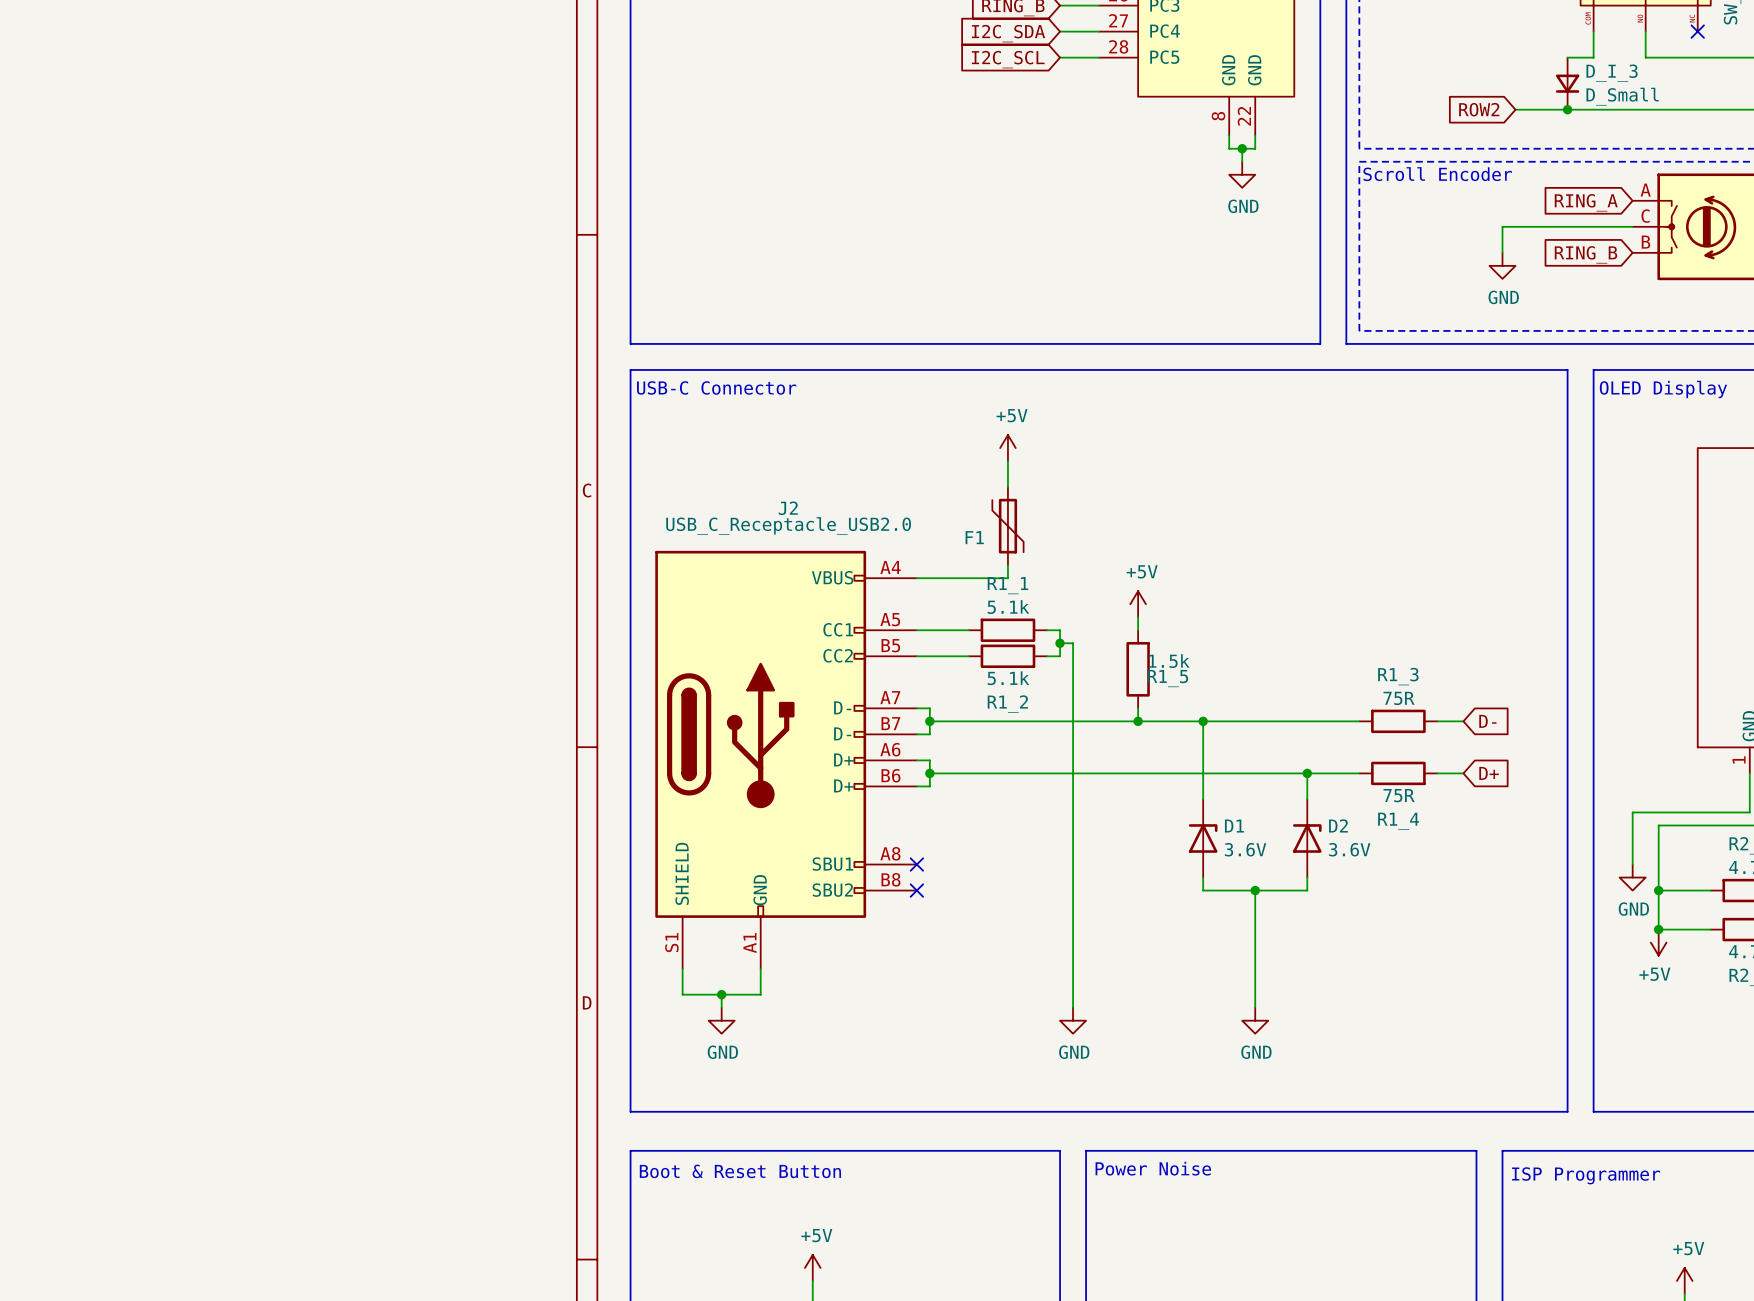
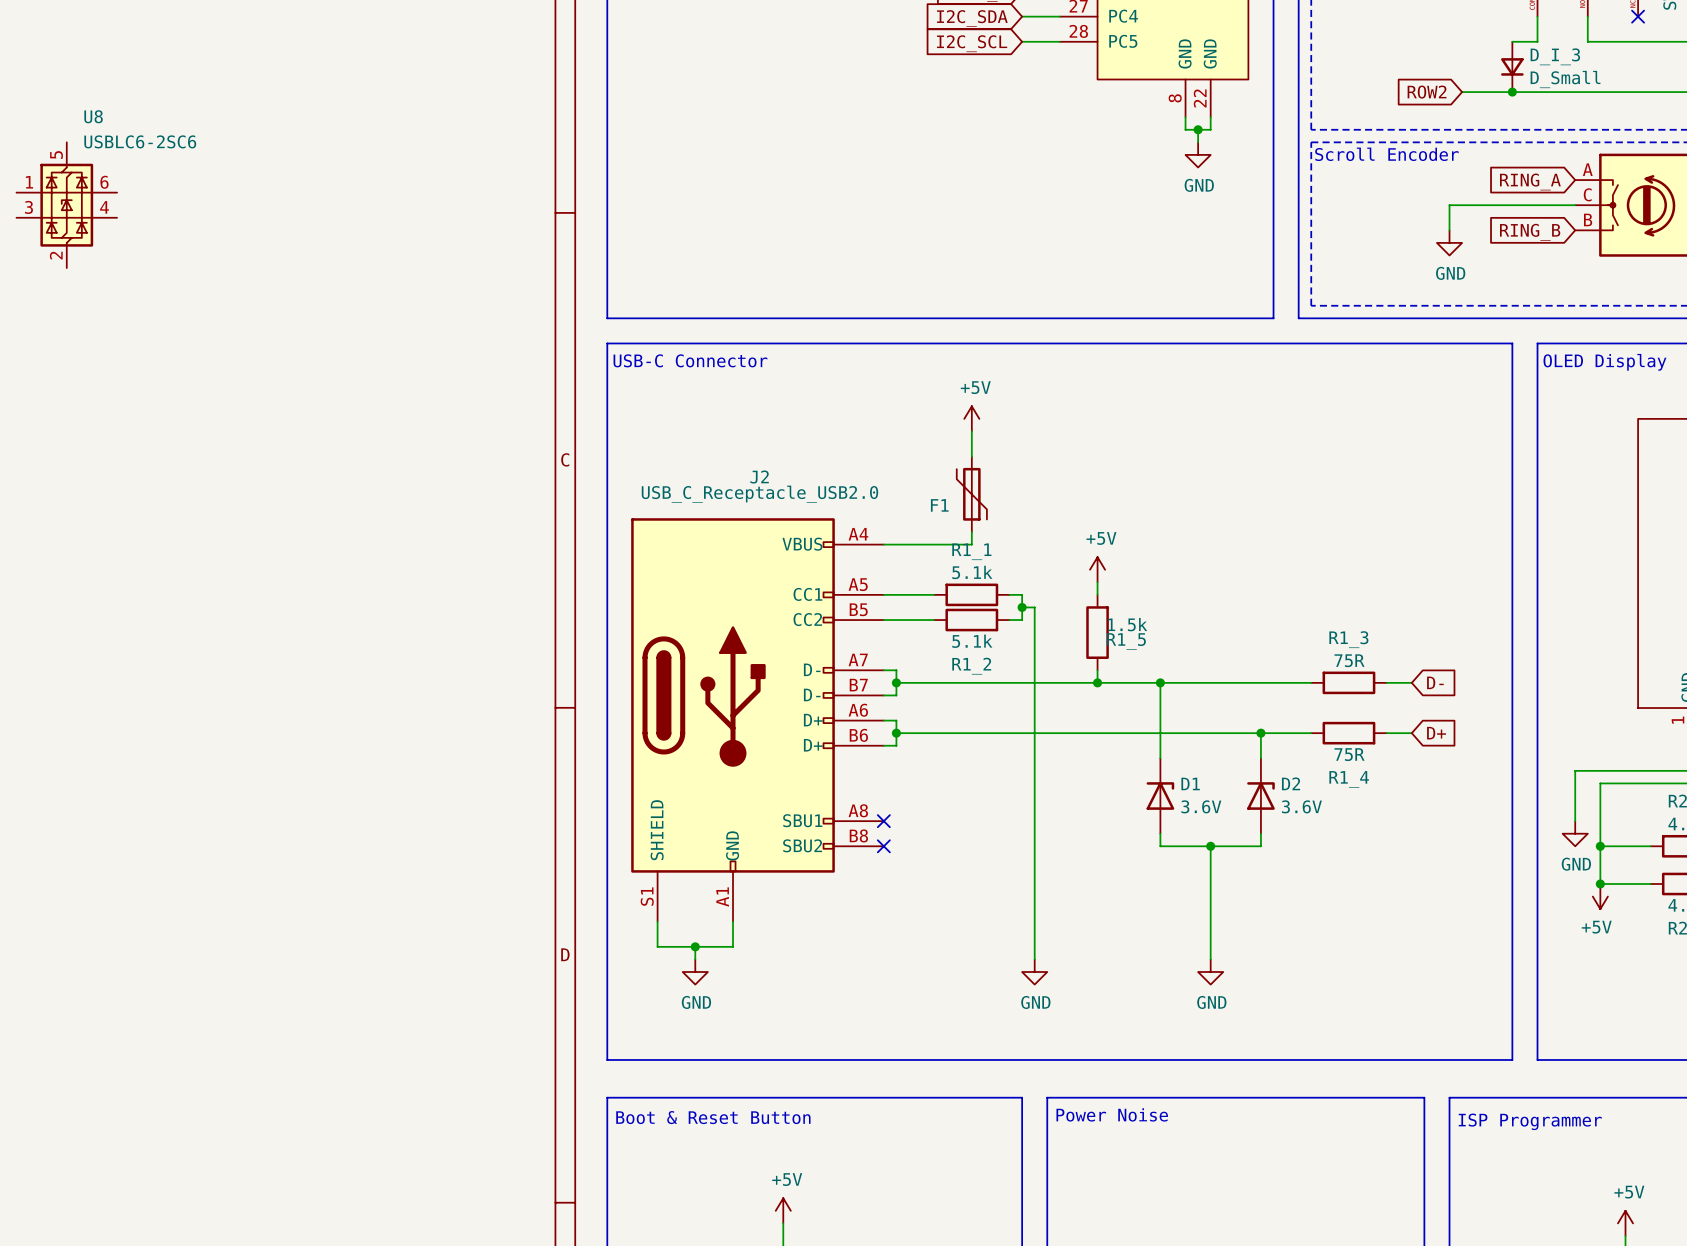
U8: none -> USBLC6-2SC6 (66, 205)

